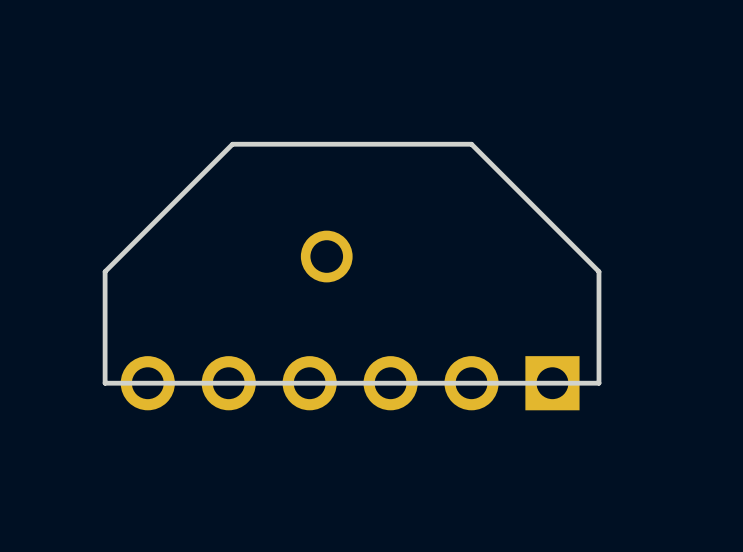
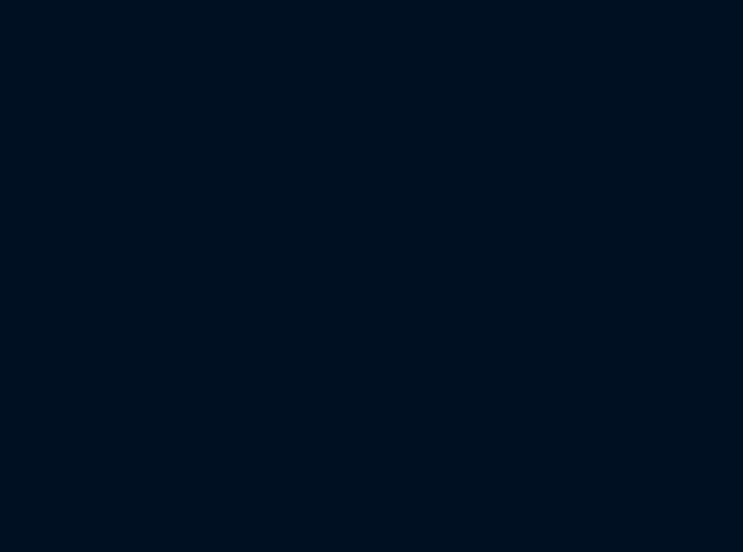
board edge: (471, 144) (232, 144) (105, 271) (105, 383) (598, 383) (598, 271) (471, 144) -> none
part: (326, 256) -> none
part: (350, 383) -> none

